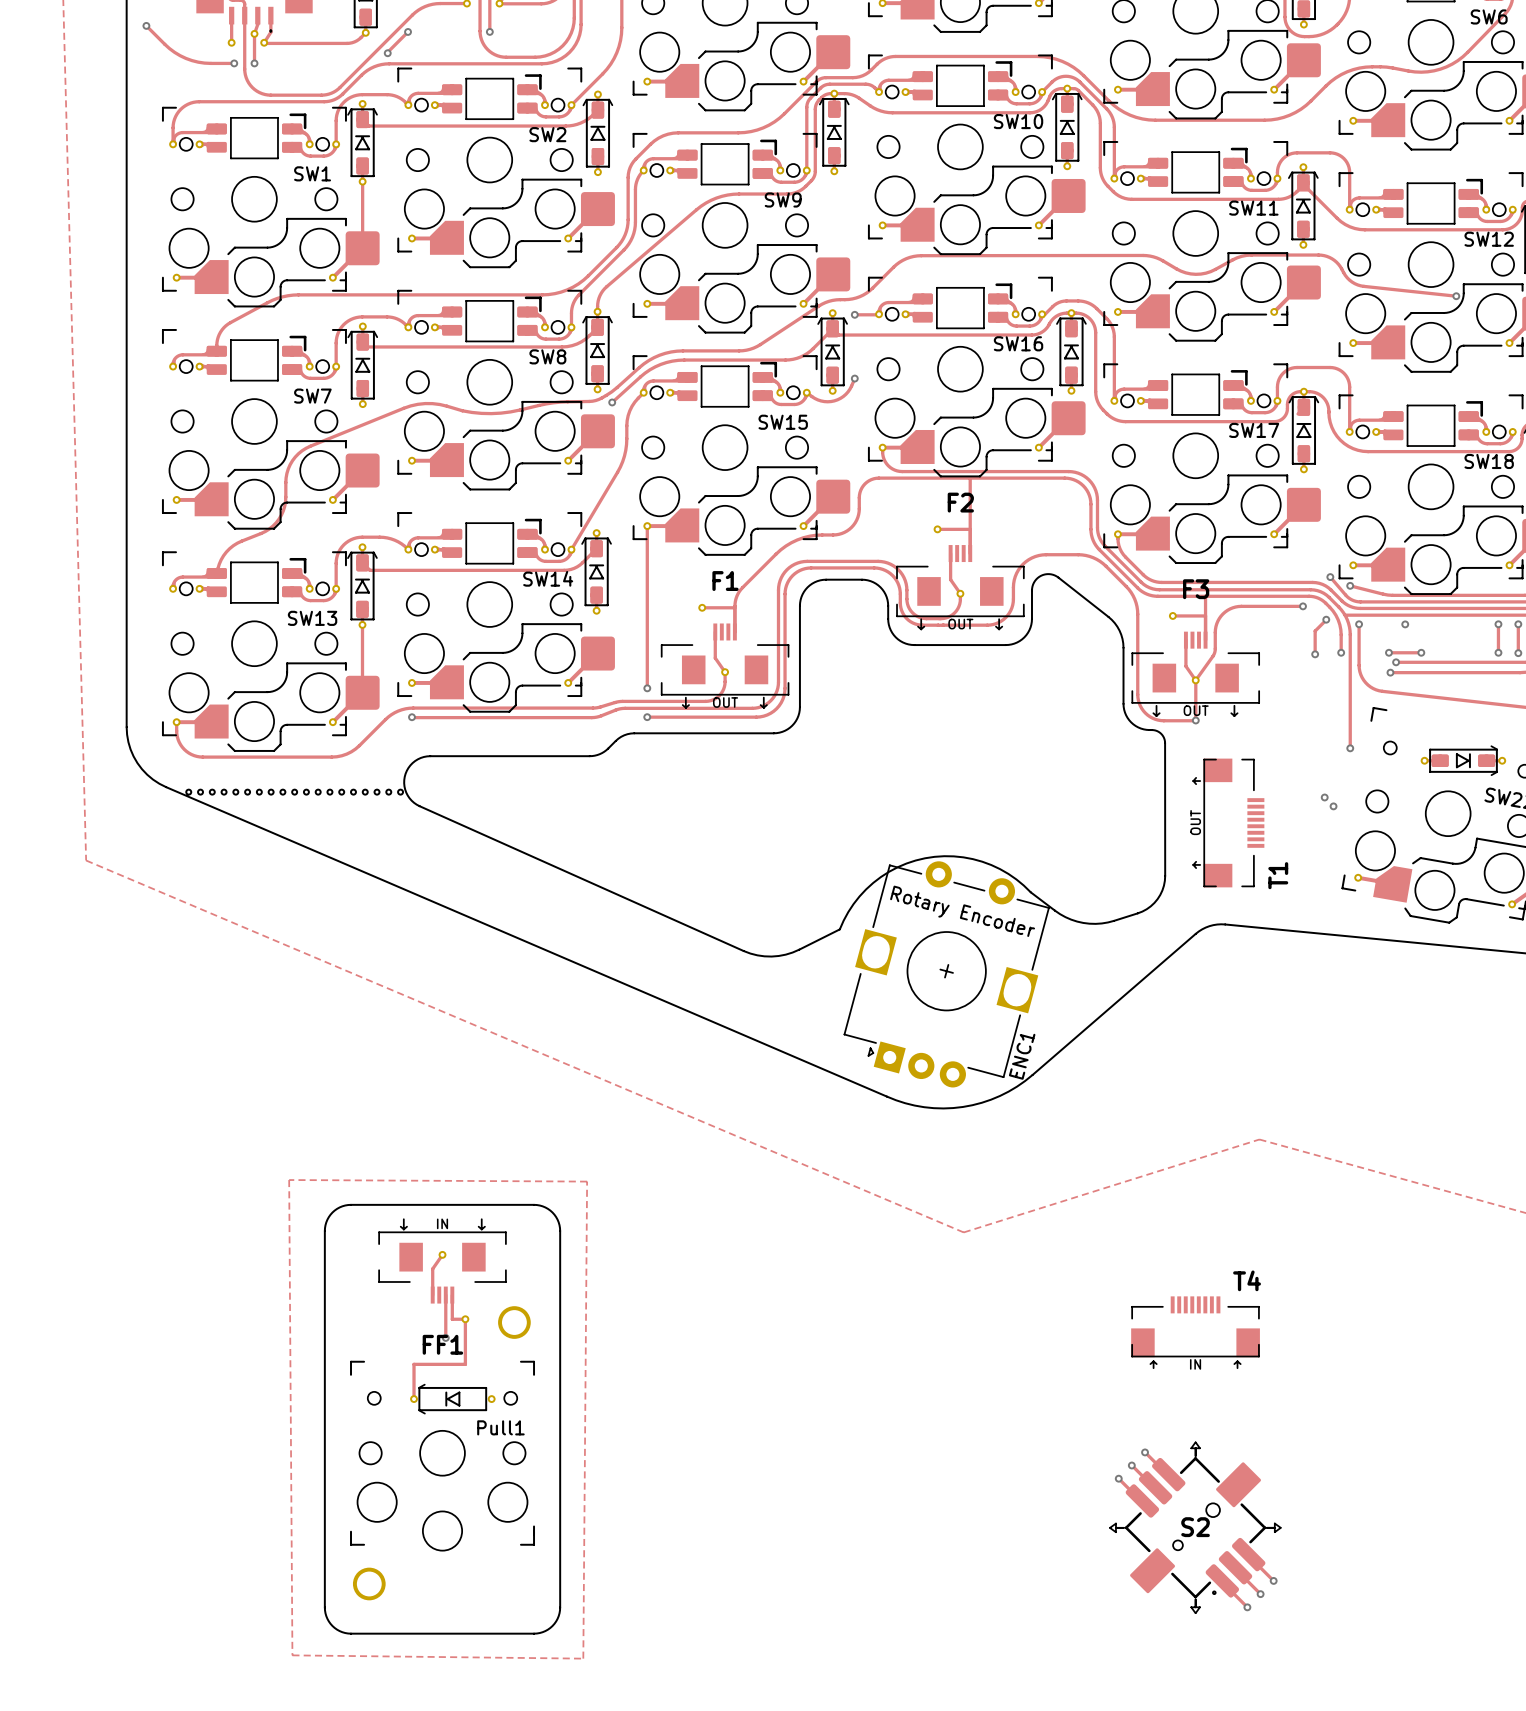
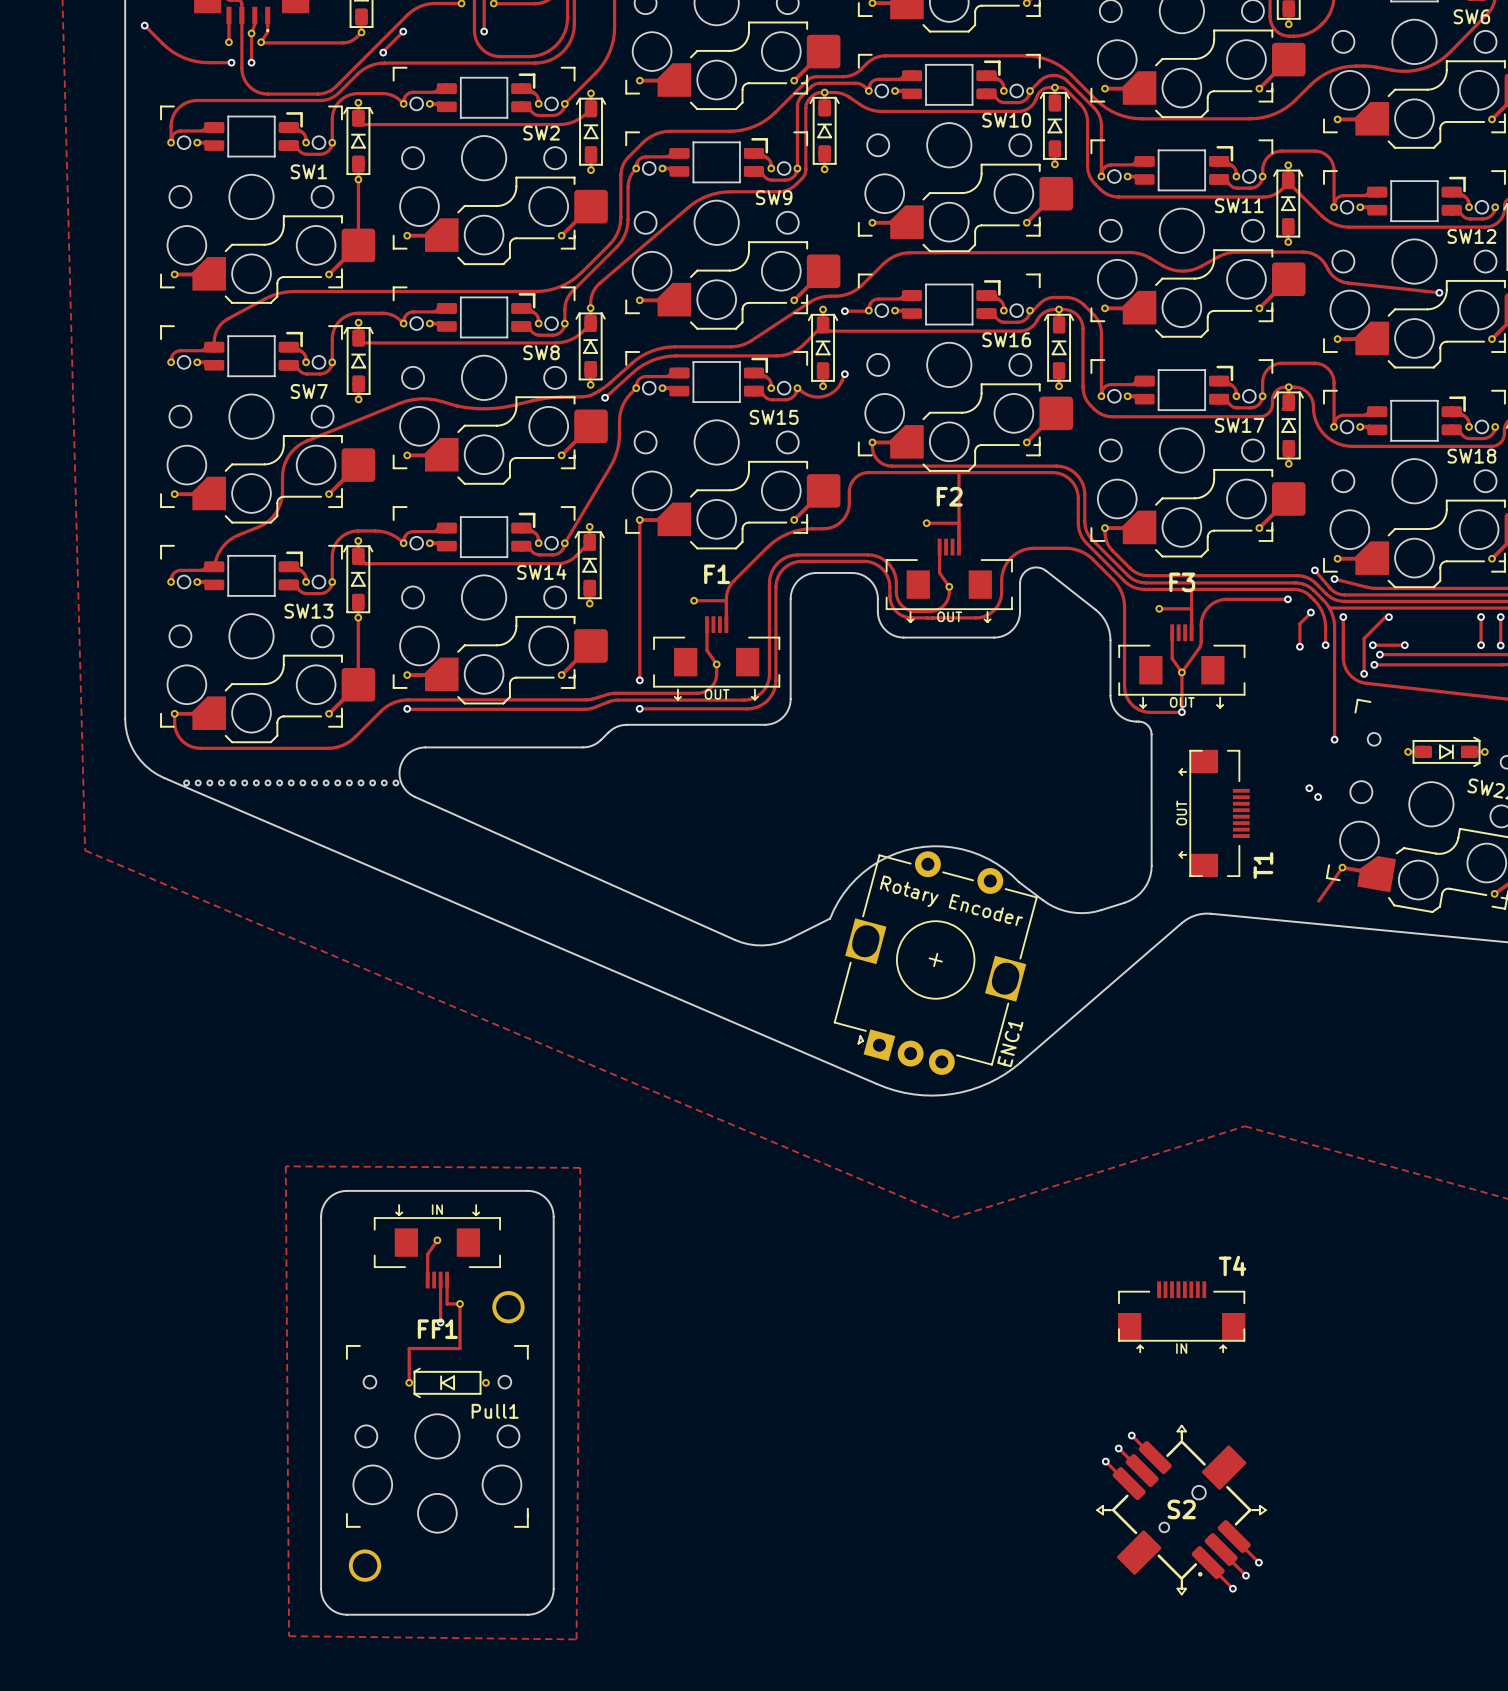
track: none -> (1388, 617) (1385, 617) (1364, 638) (1364, 673)
via: none -> (1364, 673)
track: none -> (1342, 867) (1318, 901)

